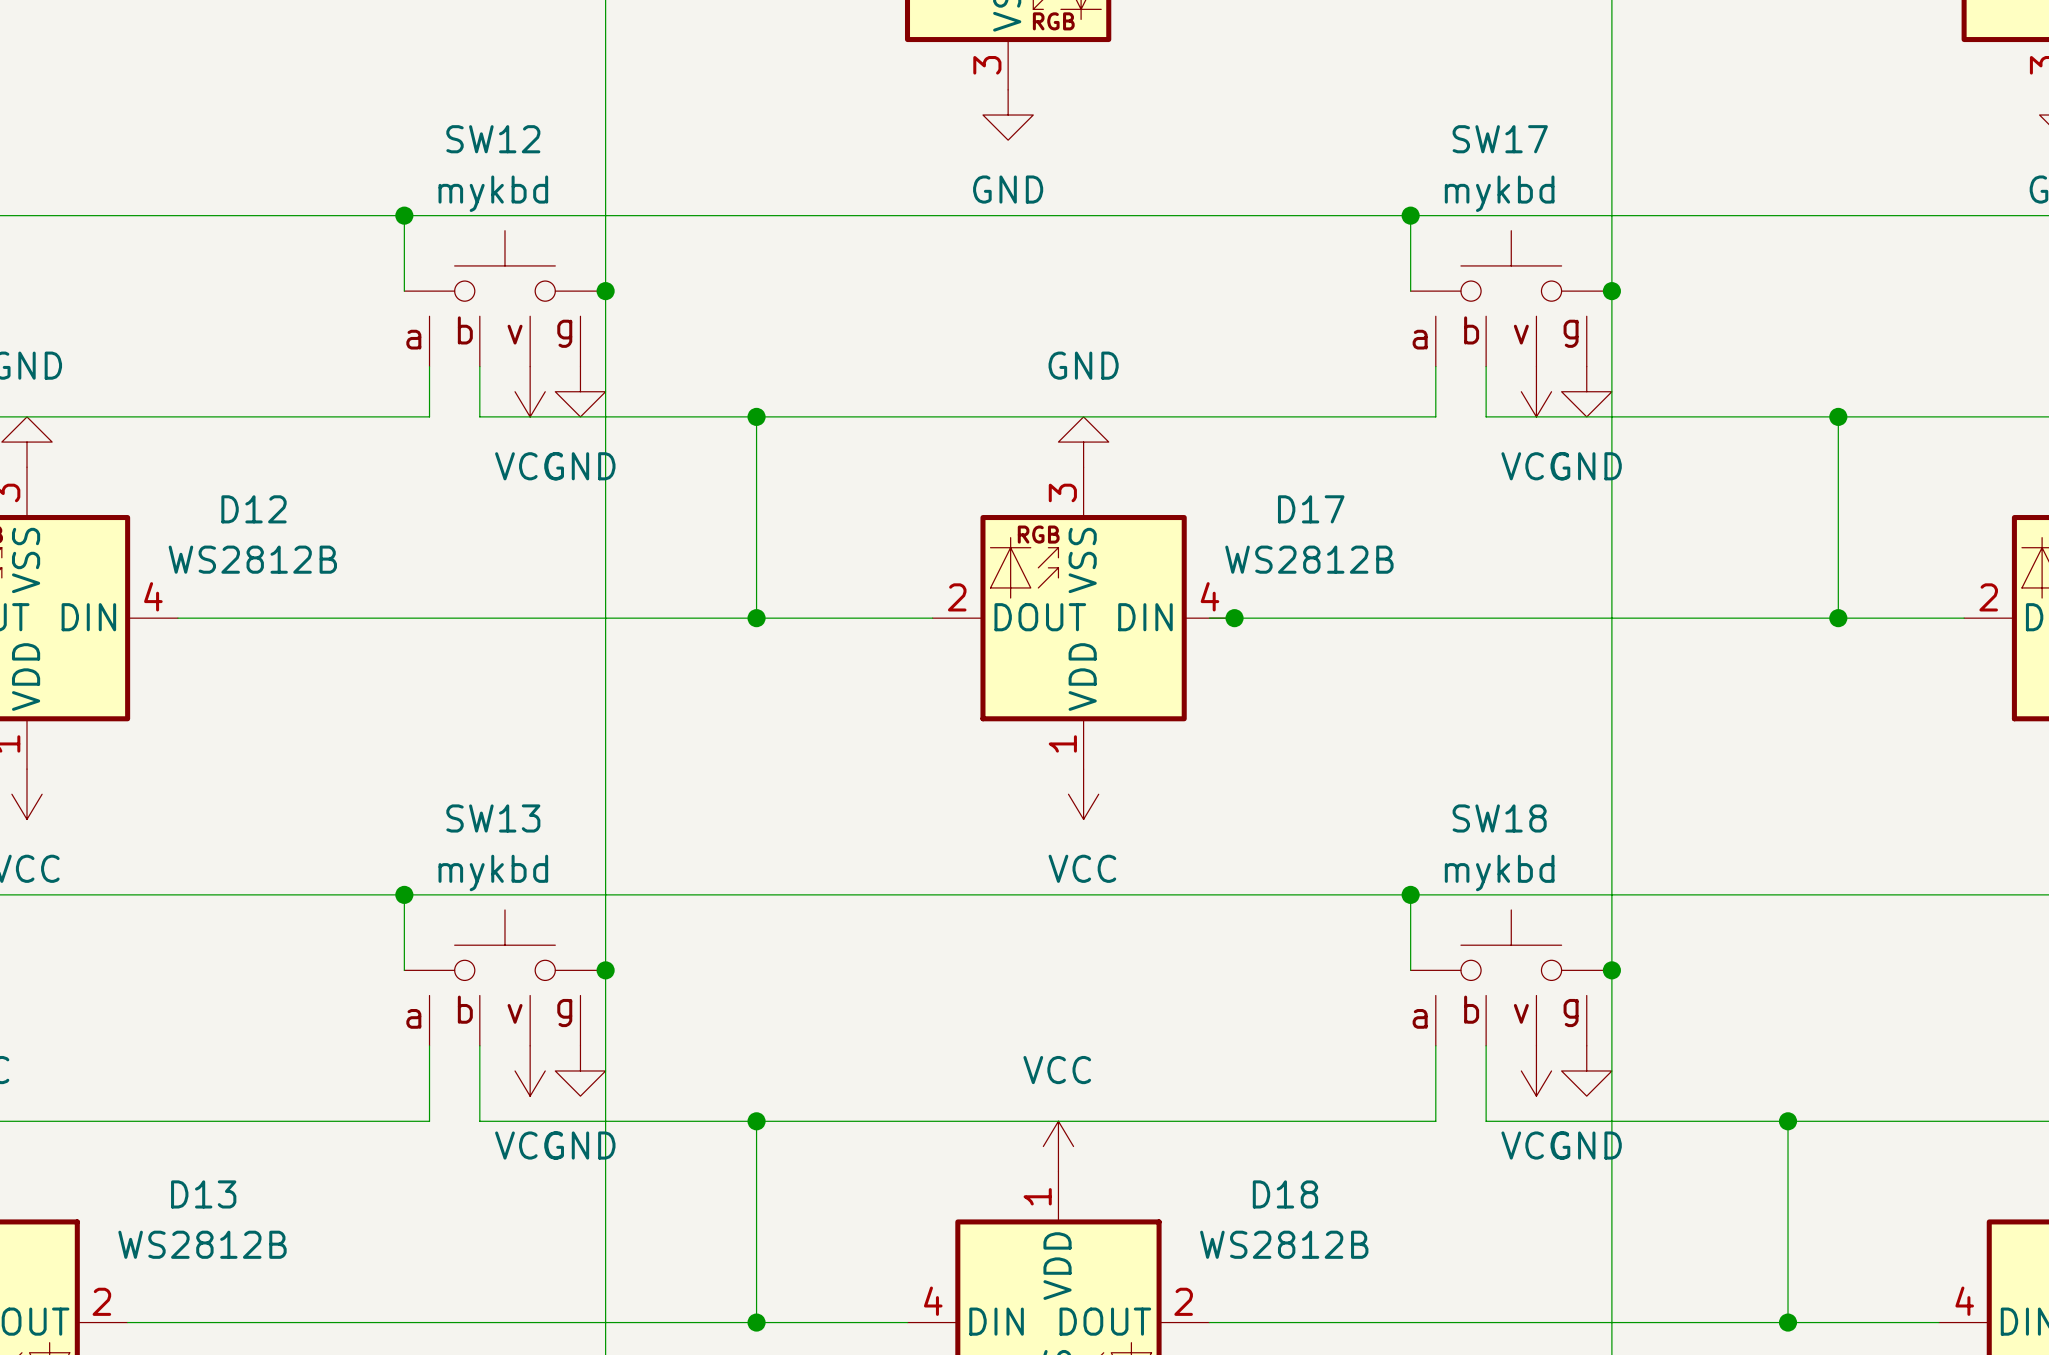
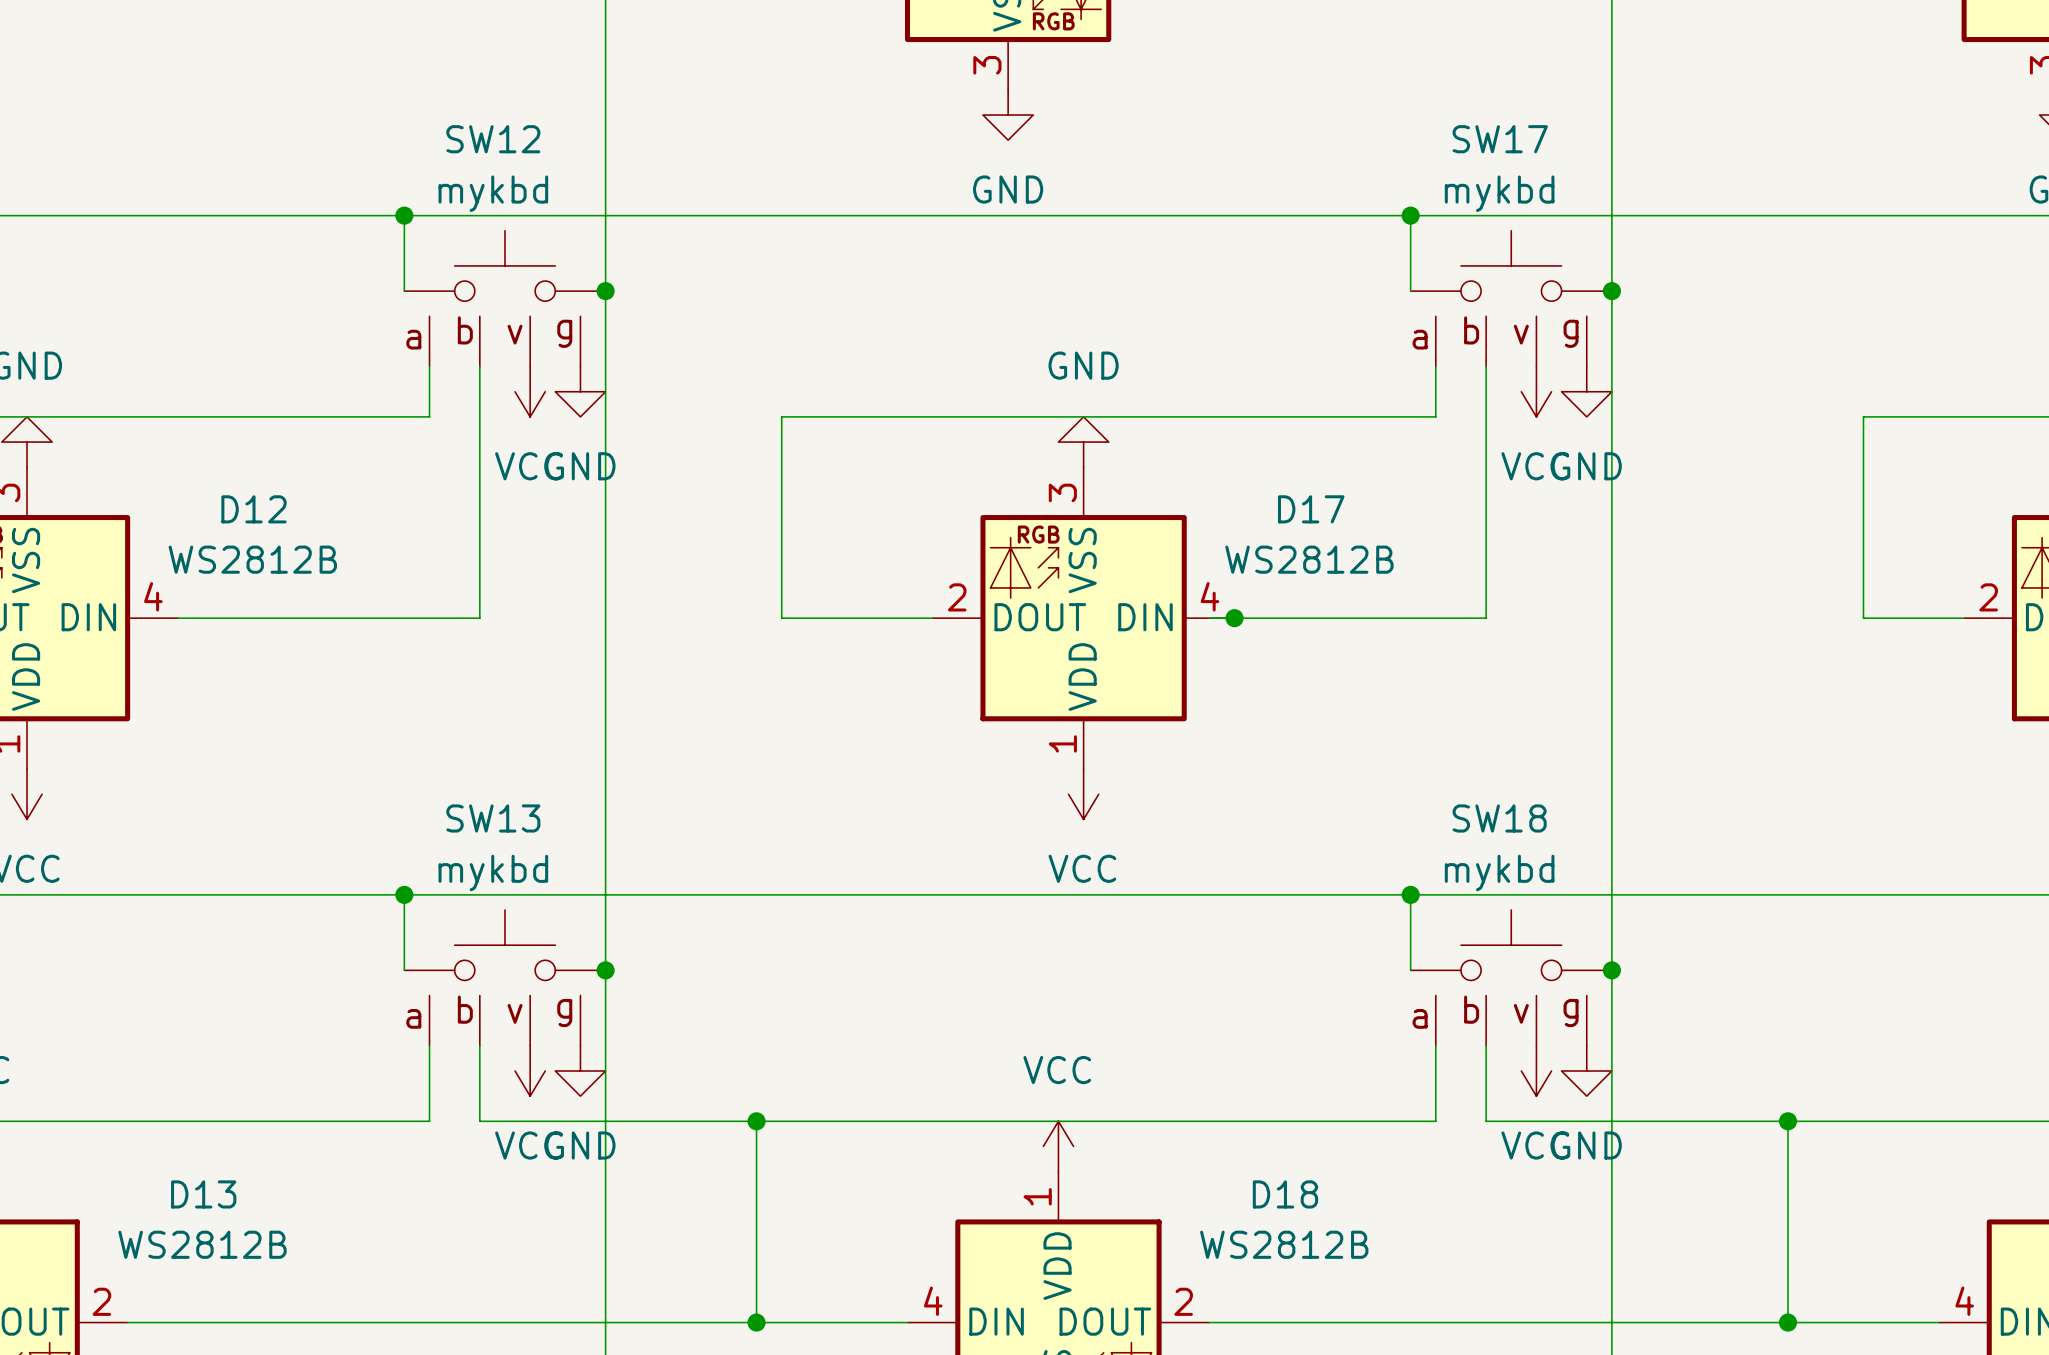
wire: (479, 416) (781, 416) -> (479, 416) (479, 618)
wire: (756, 416) (756, 618) -> none
junction: (756, 416) -> none
wire: (1486, 416) (1863, 416) -> (1486, 416) (1486, 618)
wire: (1838, 416) (1838, 618) -> none
junction: (1838, 416) -> none
wire: (479, 618) (781, 618) -> (781, 416) (781, 618)
junction: (756, 618) -> none
wire: (1486, 618) (1863, 618) -> (1863, 416) (1863, 618)
junction: (1838, 618) -> none

